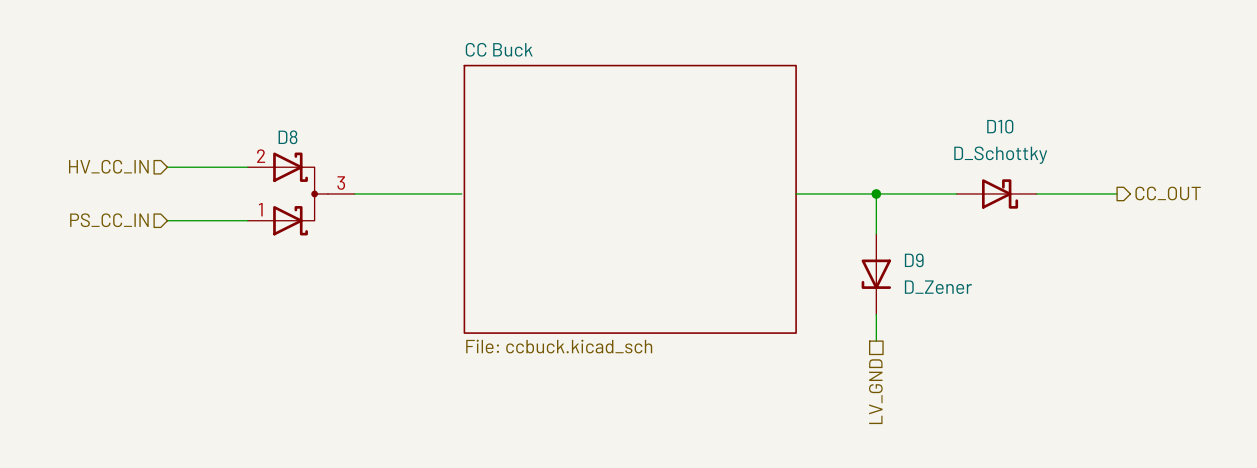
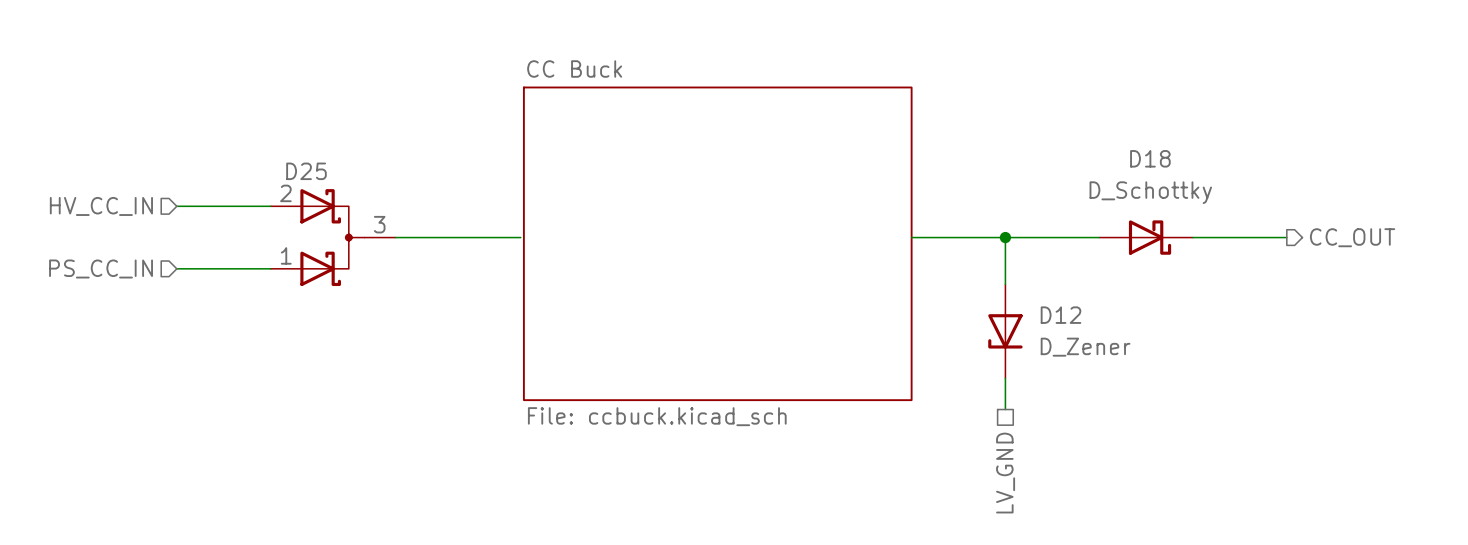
D10 name: D10 (1000, 126) -> D18 (1150, 158)
D8 name: D8 (287, 137) -> D25 (306, 171)
D9 name: D9 (914, 260) -> D12 (1061, 315)

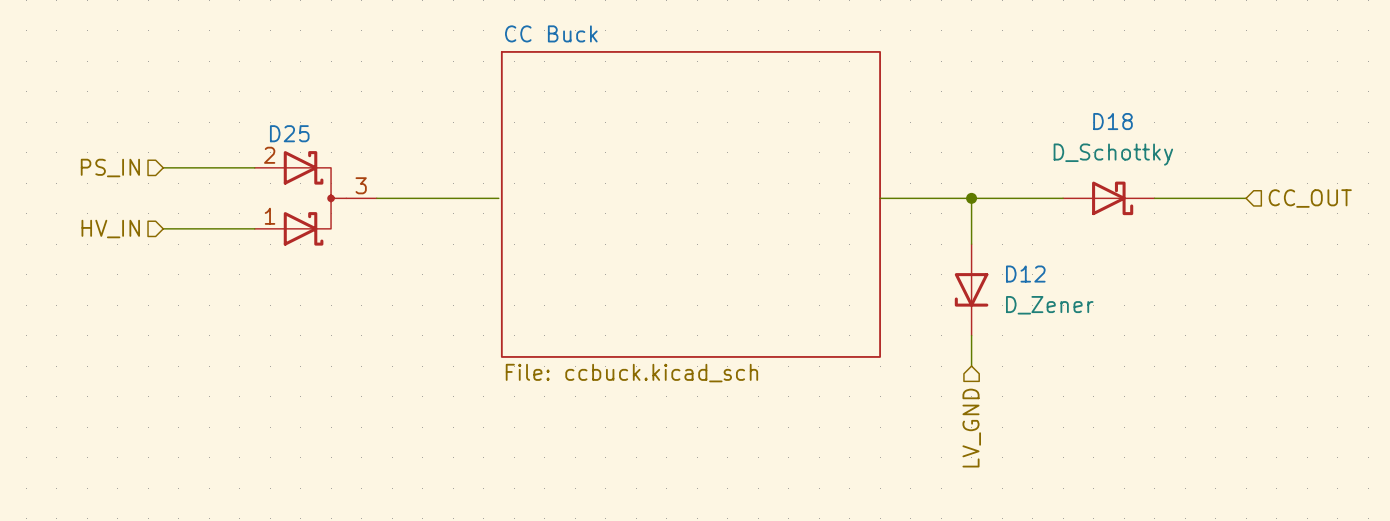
hierarchical label: HV_CC_IN (101, 206) -> PS_IN (110, 168)
hierarchical label shape: output (1352, 237) -> input (1310, 198)
hierarchical label: PS_CC_IN (101, 268) -> HV_IN (110, 229)
hierarchical label shape: passive (1005, 473) -> input (971, 428)

